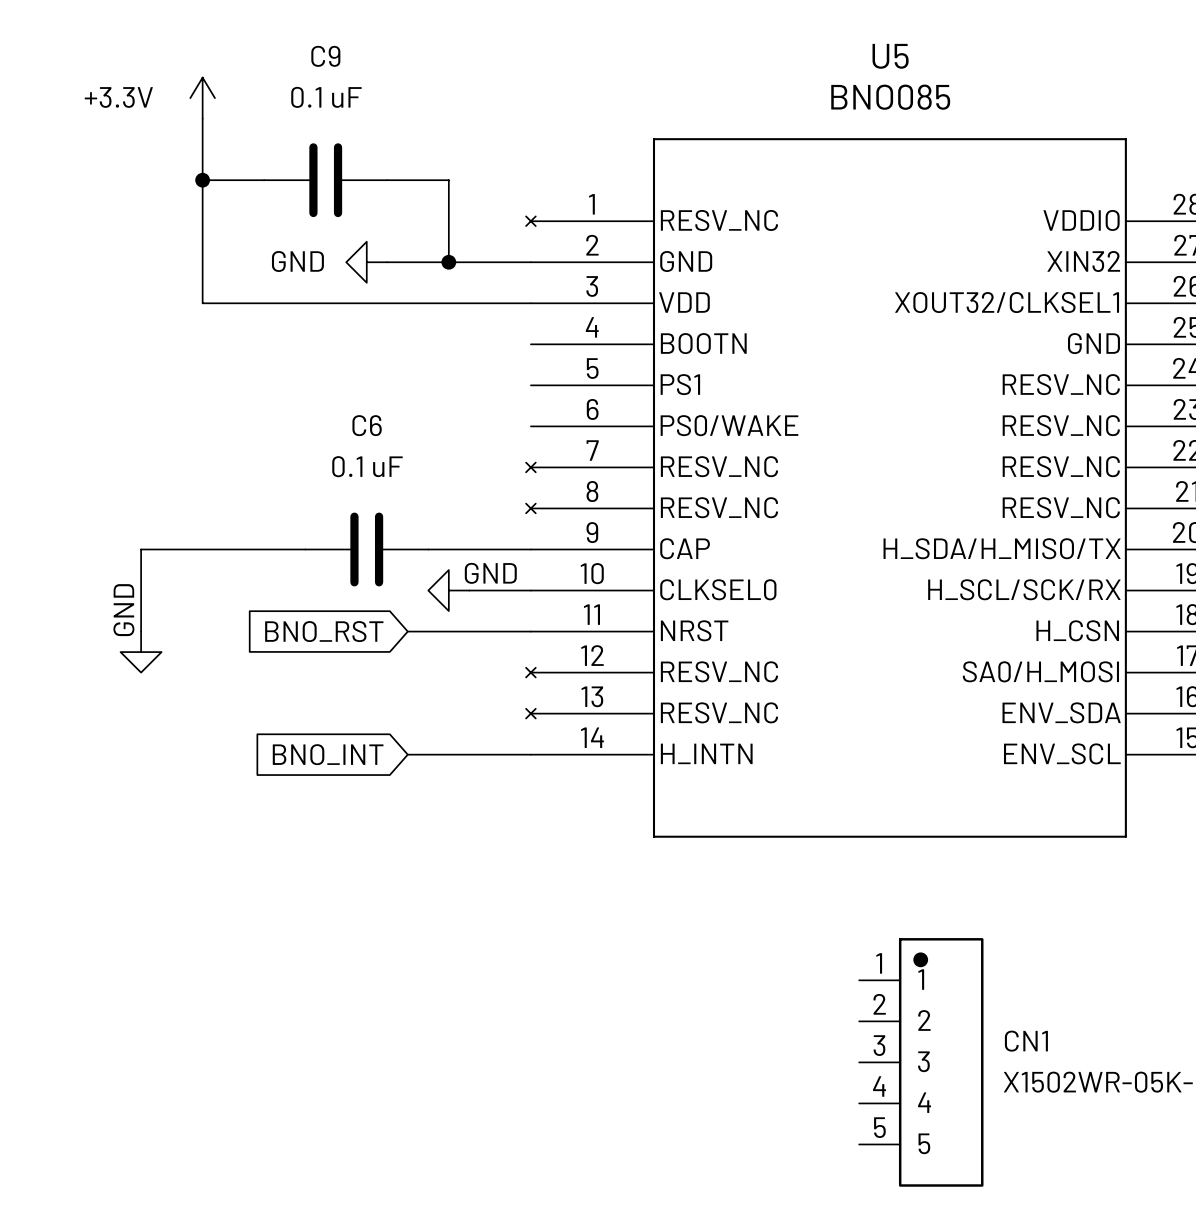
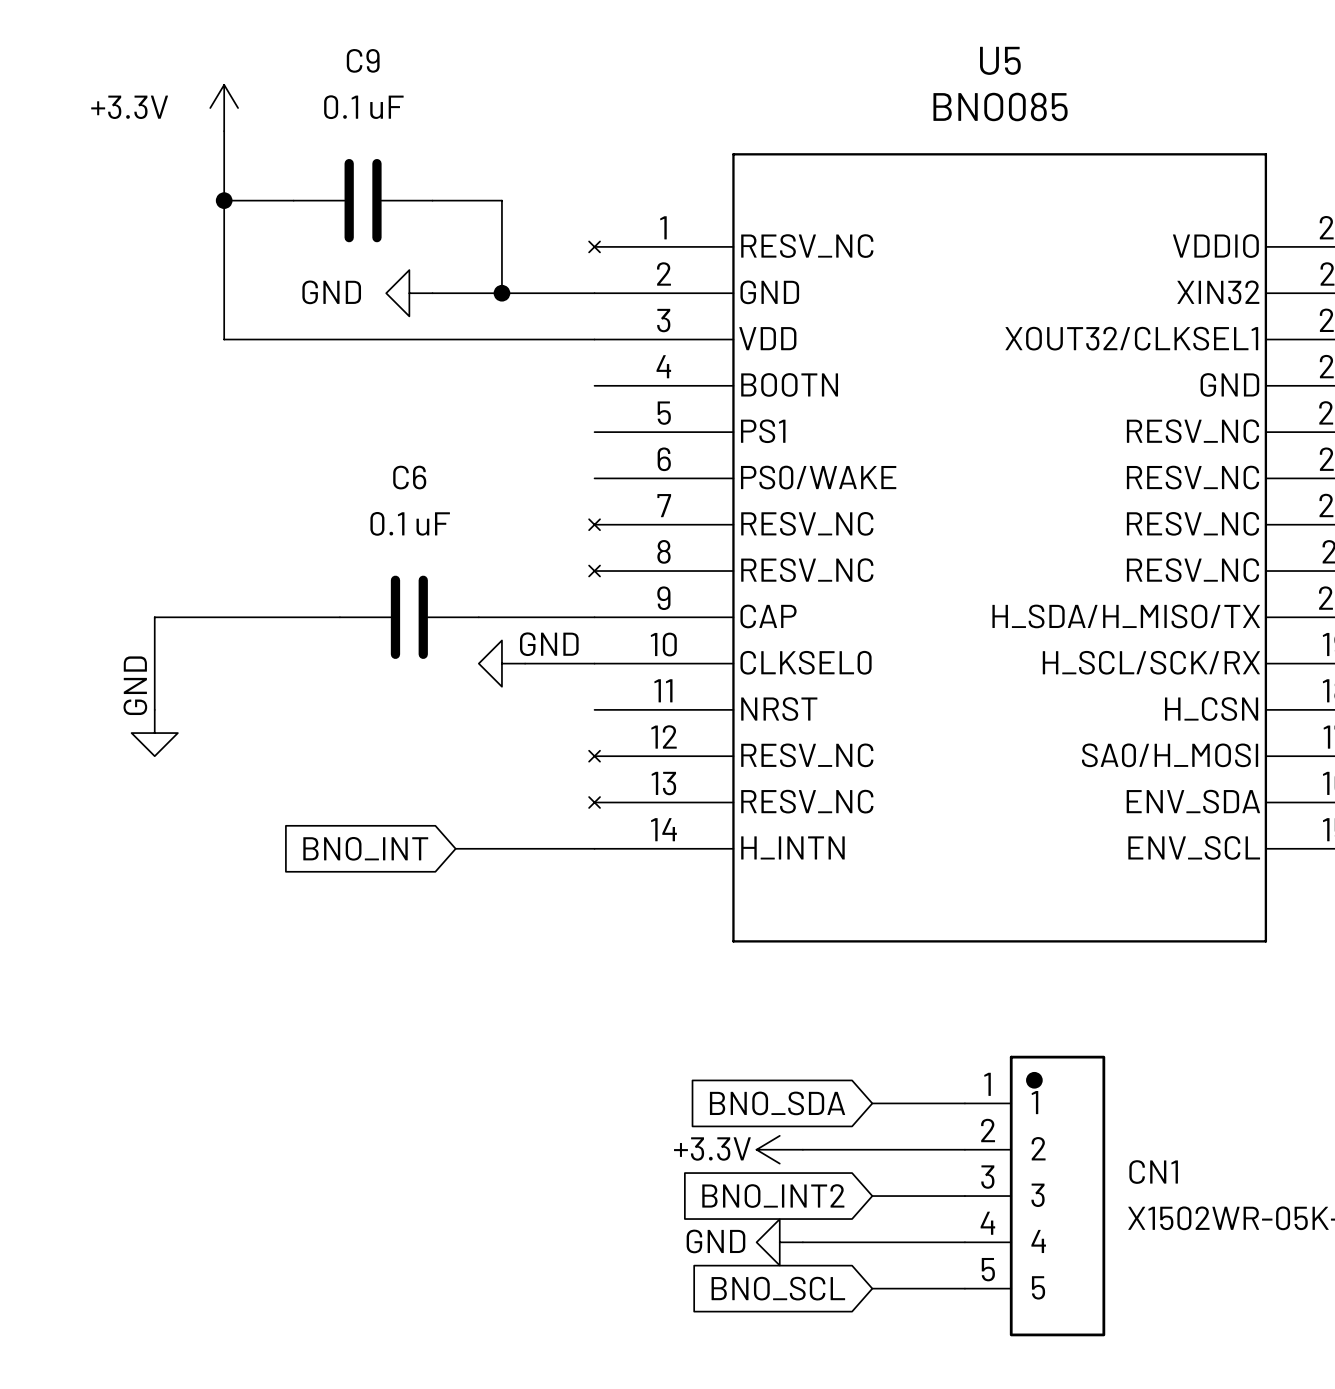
global label: BNO_RST (324, 631) -> none
wire: (407, 631) (530, 631) -> none
global label: none -> BNO_SDA (777, 1103)
wire: none -> (872, 1103) (964, 1103)
power symbol: none -> +3.3V (779, 1149)
wire: none -> (802, 1149) (964, 1149)
global label: none -> BNO_INT2 (773, 1196)
wire: none -> (872, 1196) (964, 1196)
power symbol: none -> GND (779, 1242)
wire: none -> (802, 1242) (964, 1242)
global label: none -> BNO_SCL (778, 1288)
wire: none -> (872, 1288) (964, 1288)

